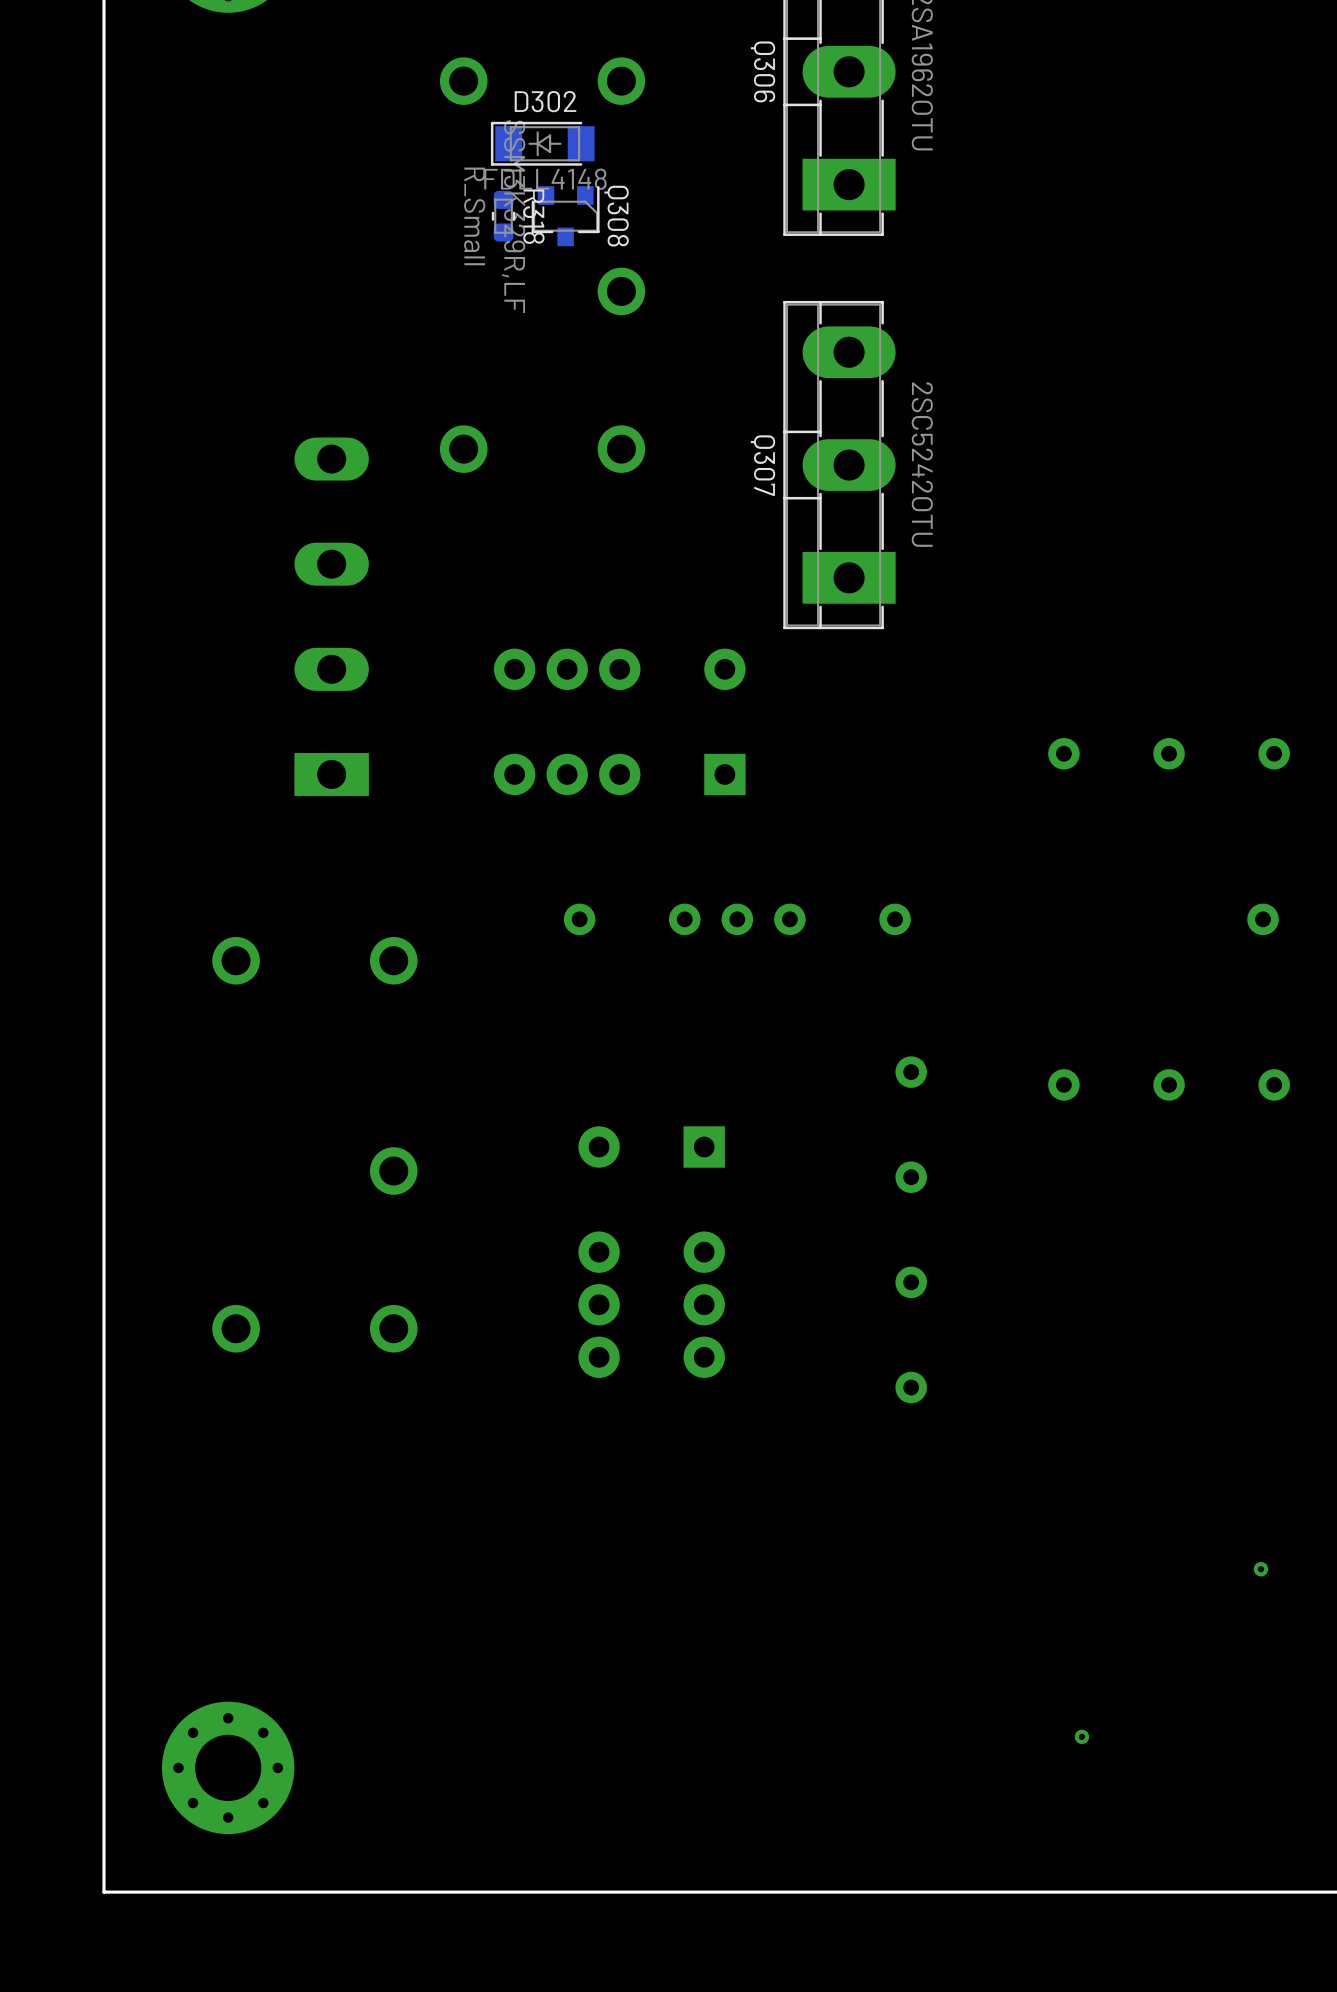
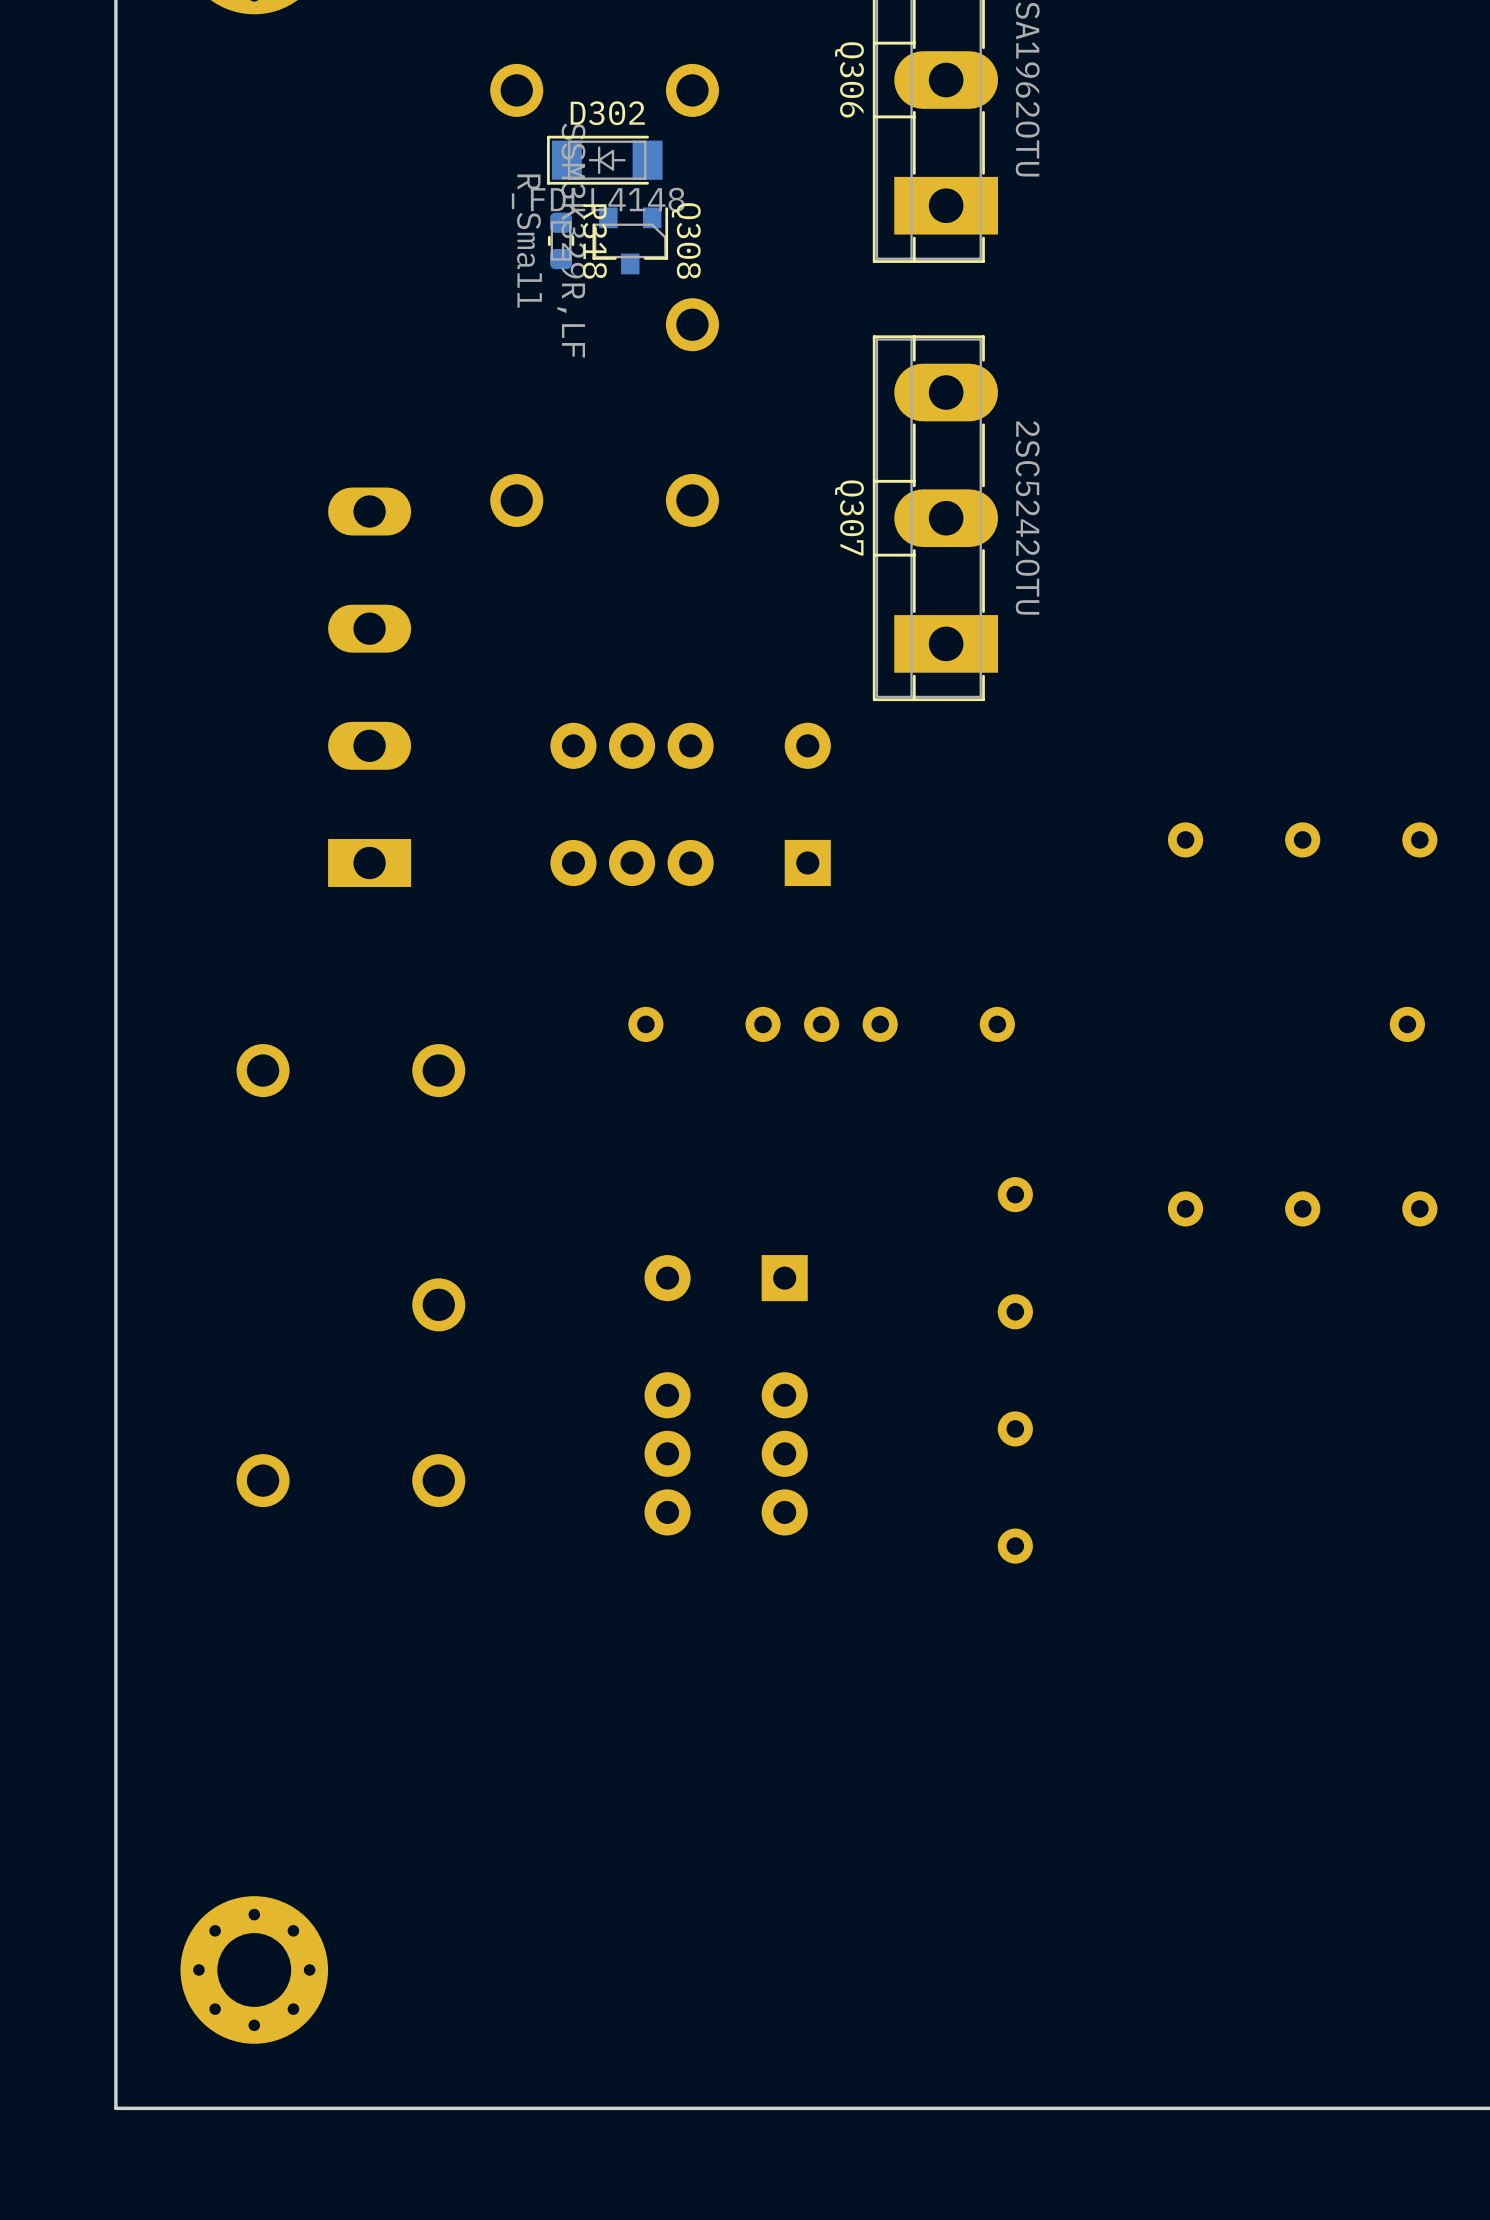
via: (1260, 1569) -> none
via: (1081, 1736) -> none

